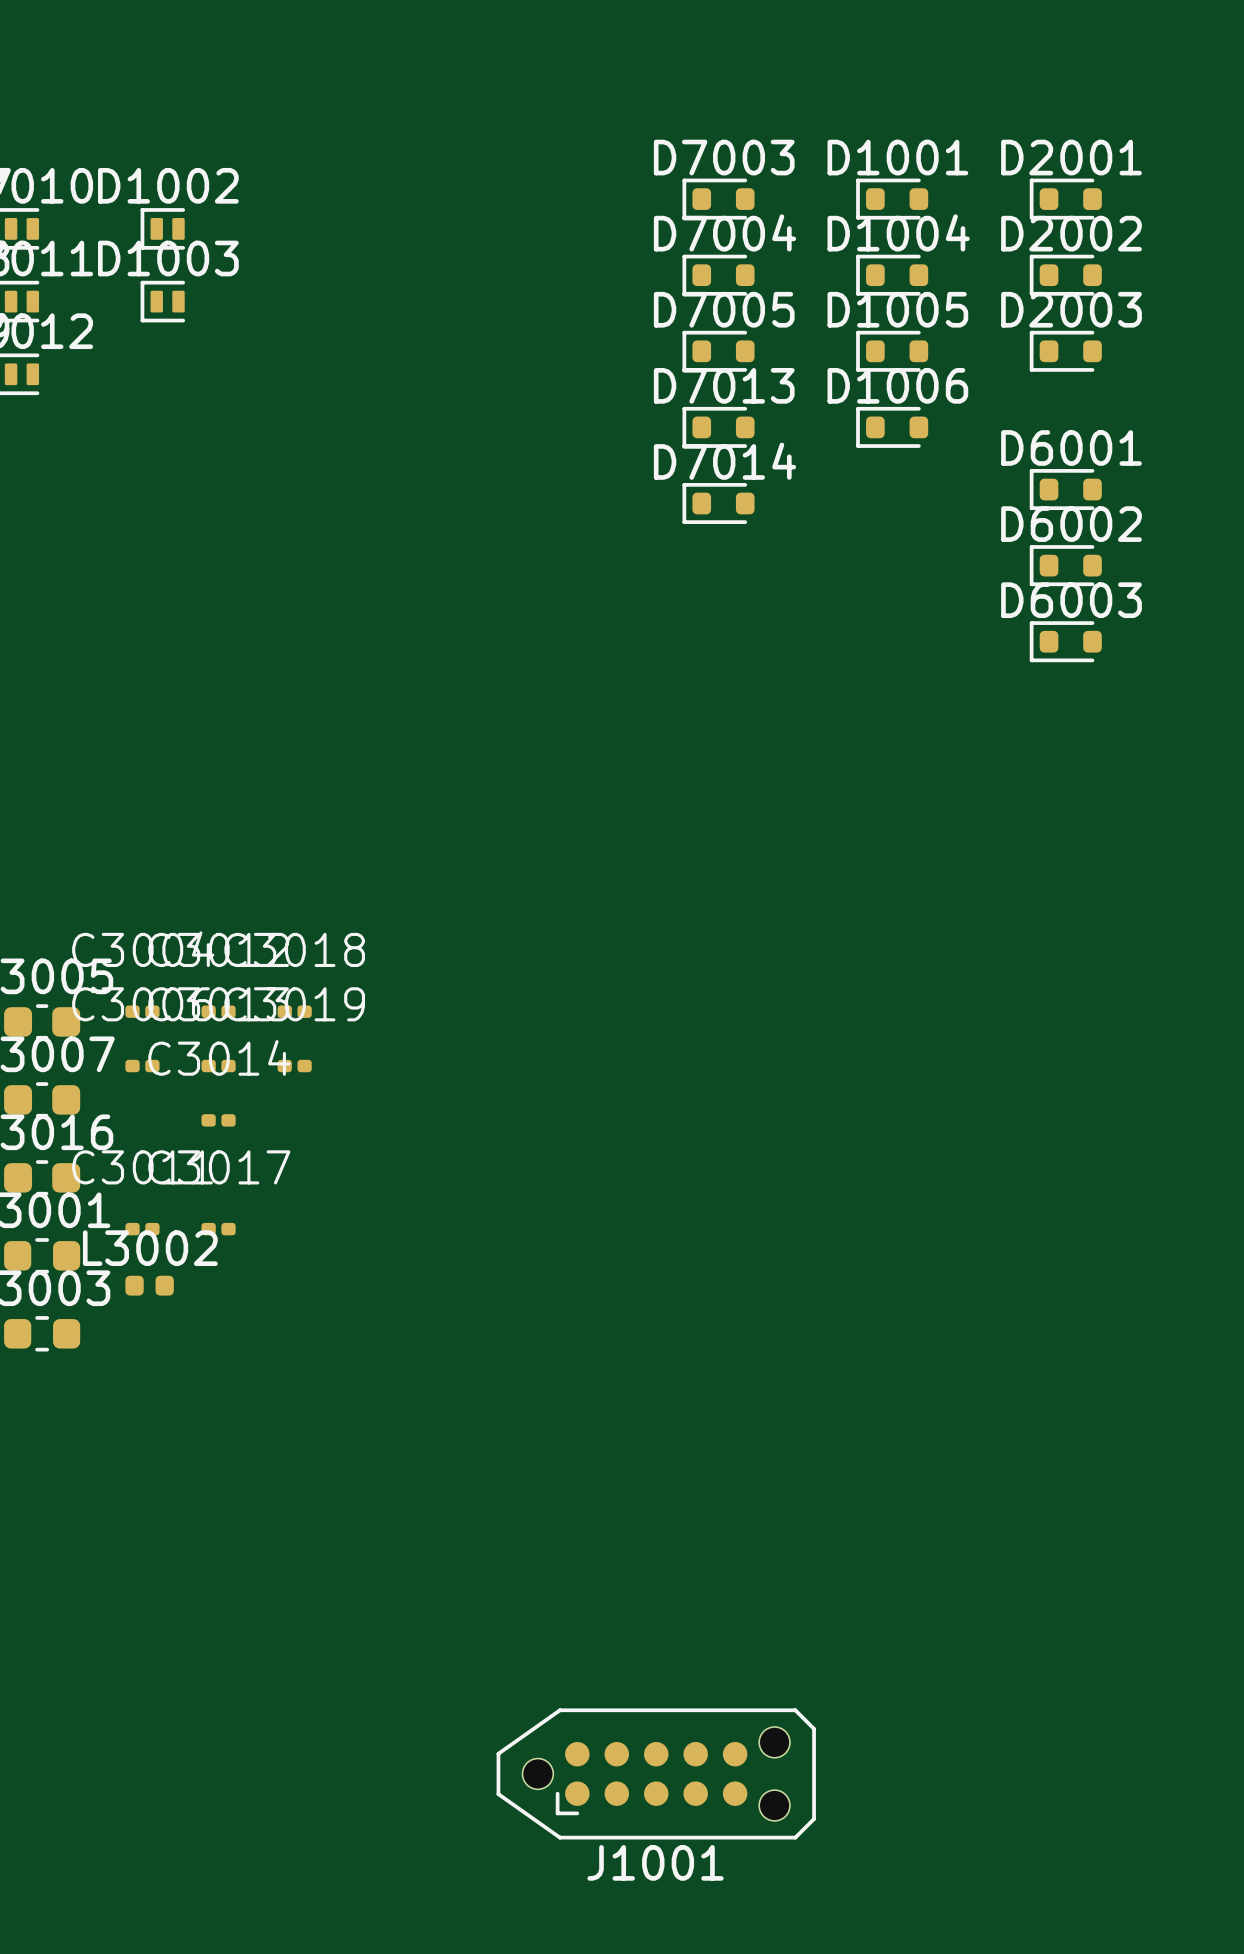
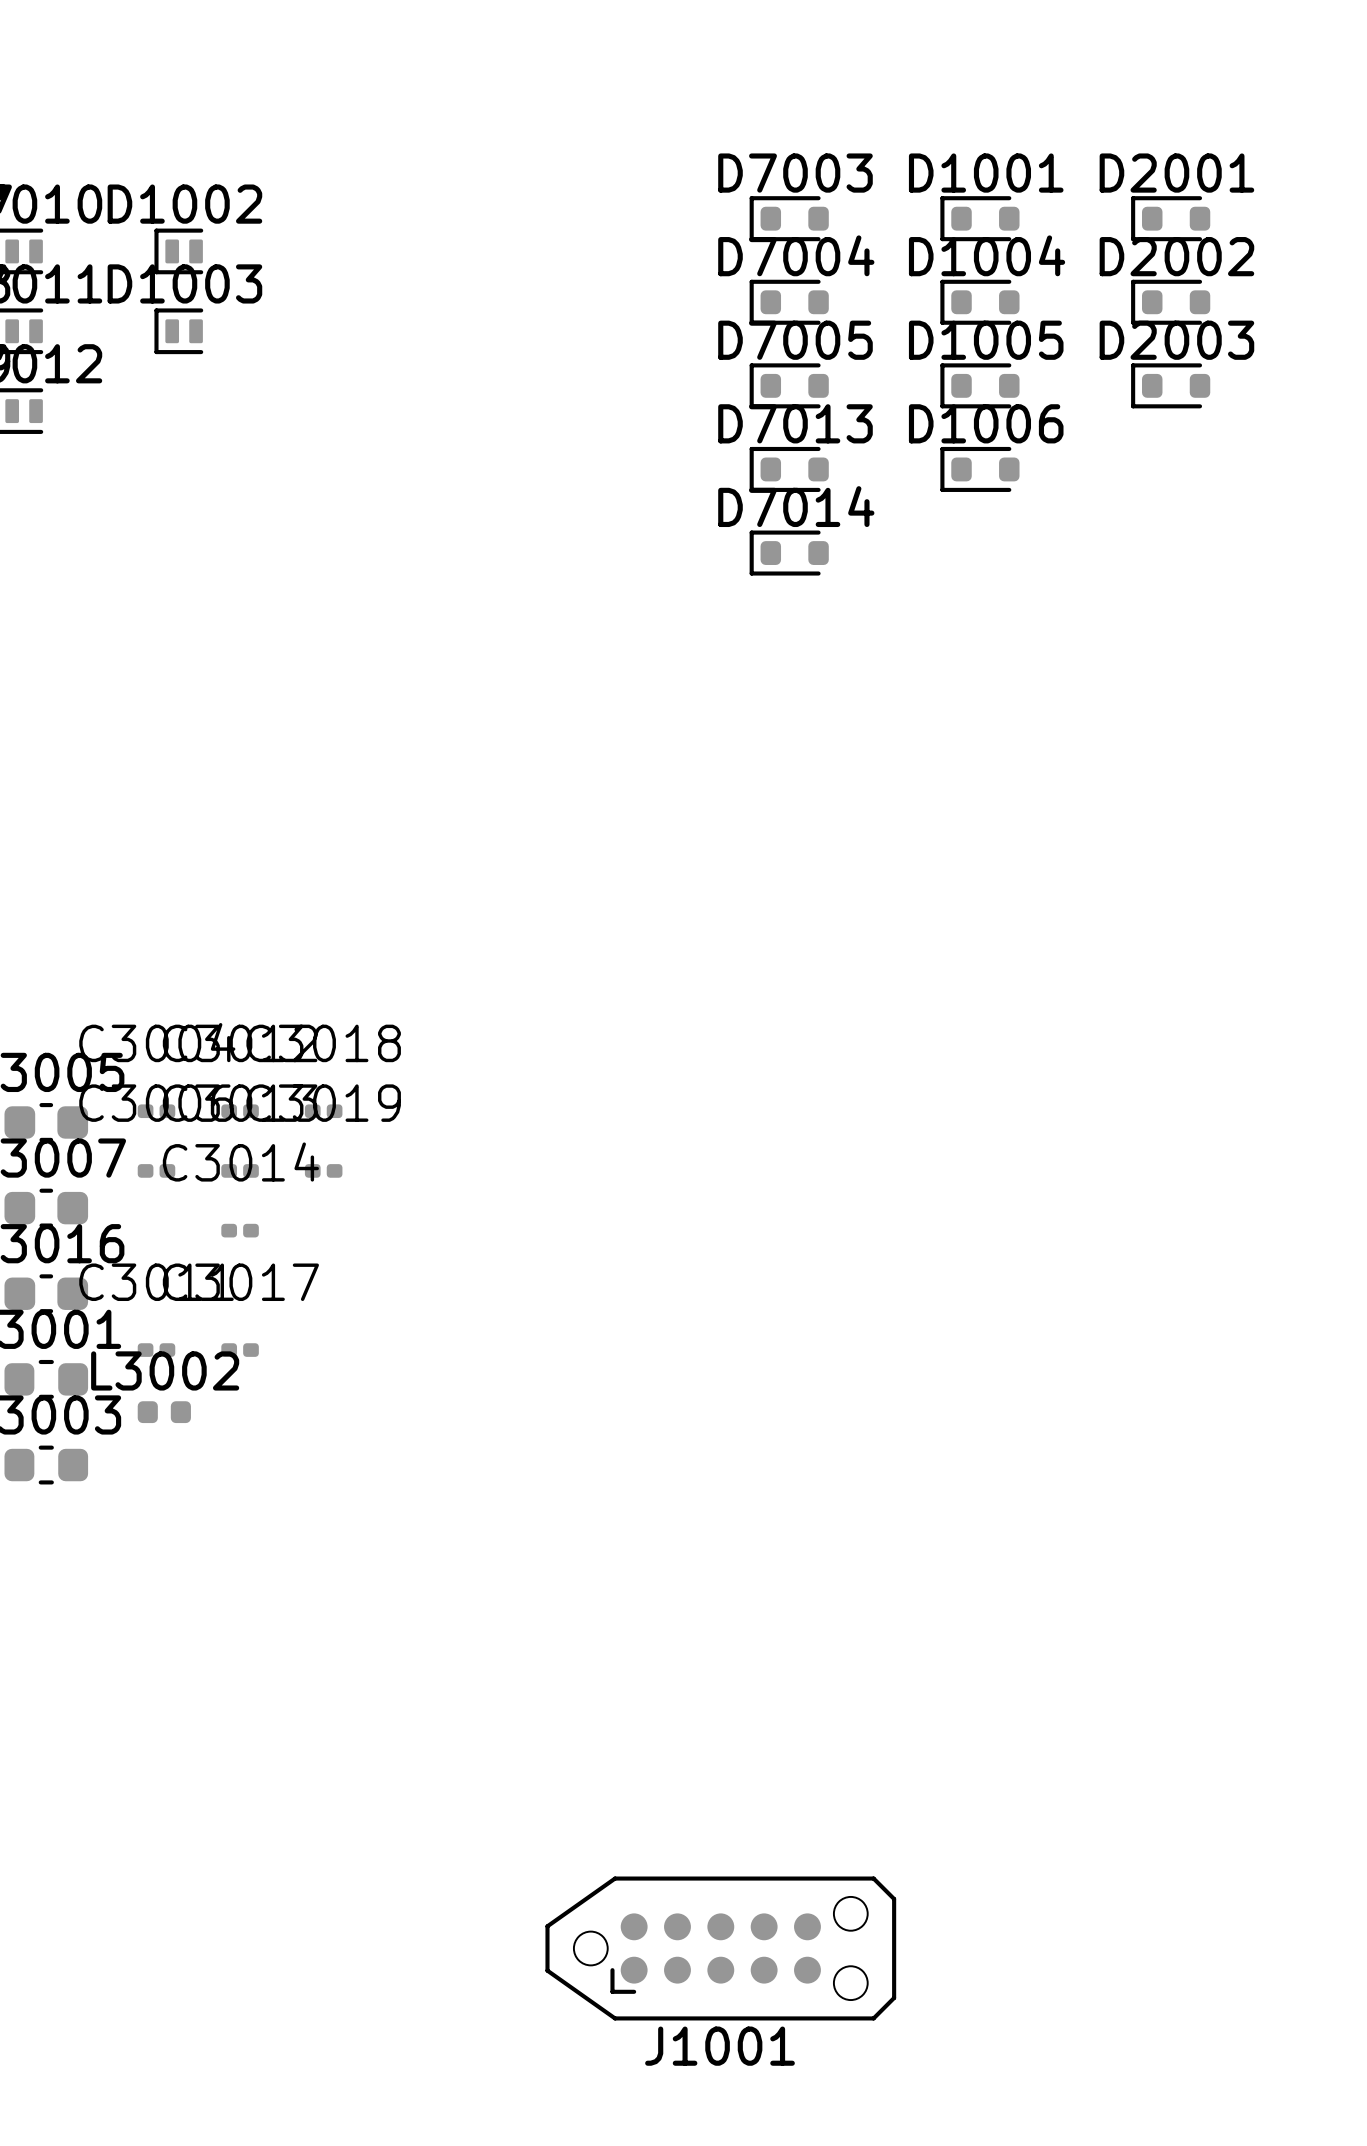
D6001: (1065, 489) -> none
D6002: (1065, 565) -> none
D6003: (1065, 641) -> none

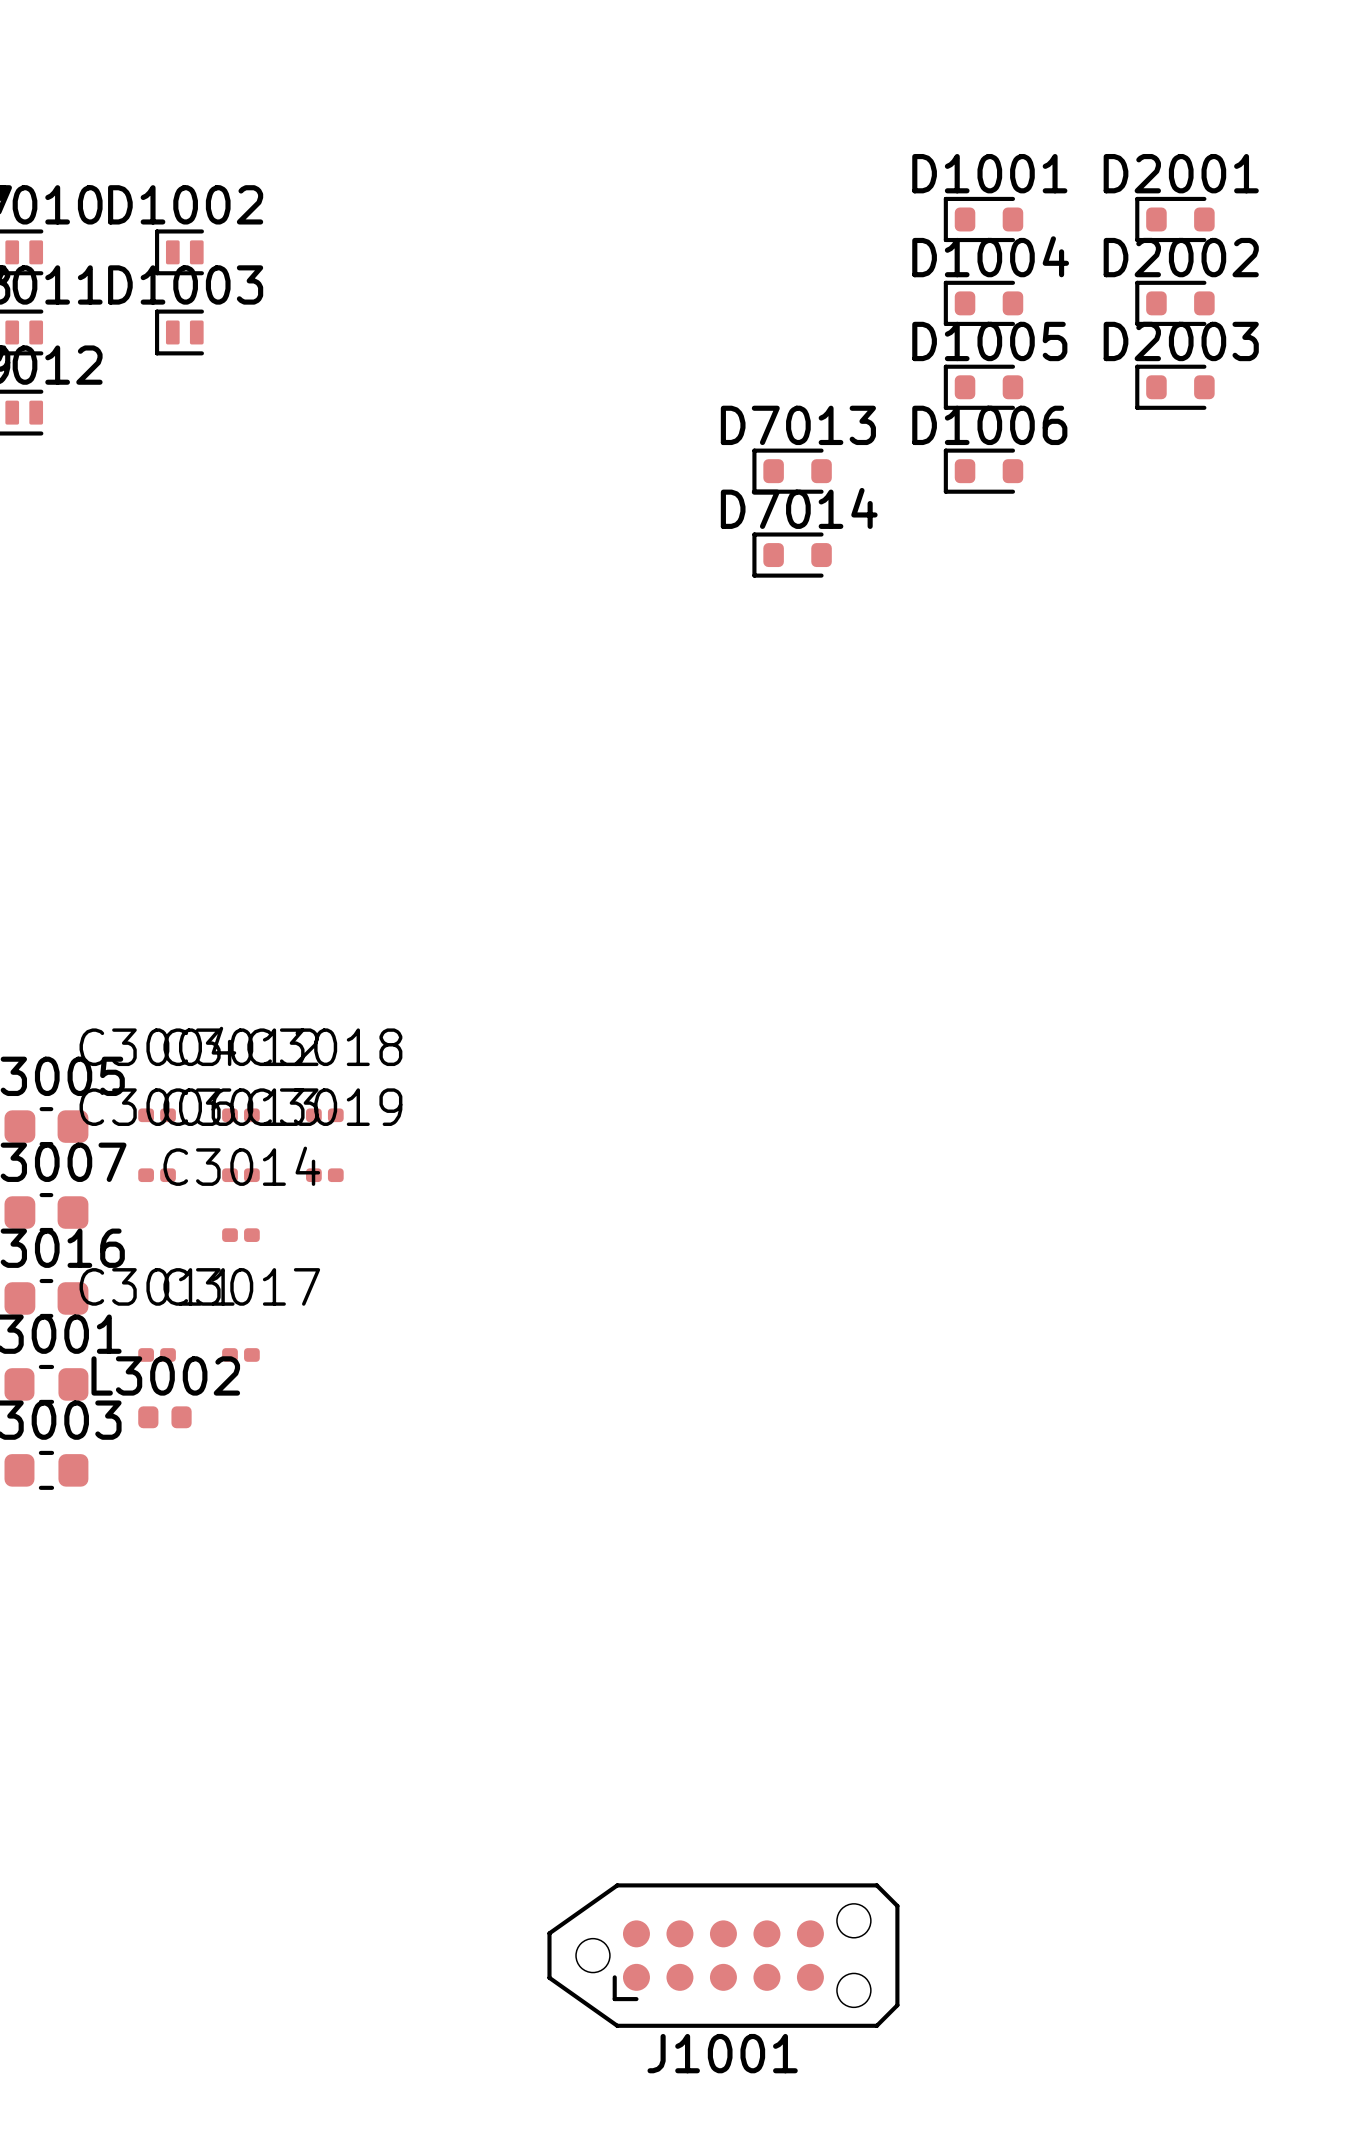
D7003: (789, 218) -> none
D7004: (789, 302) -> none
D7005: (789, 385) -> none

